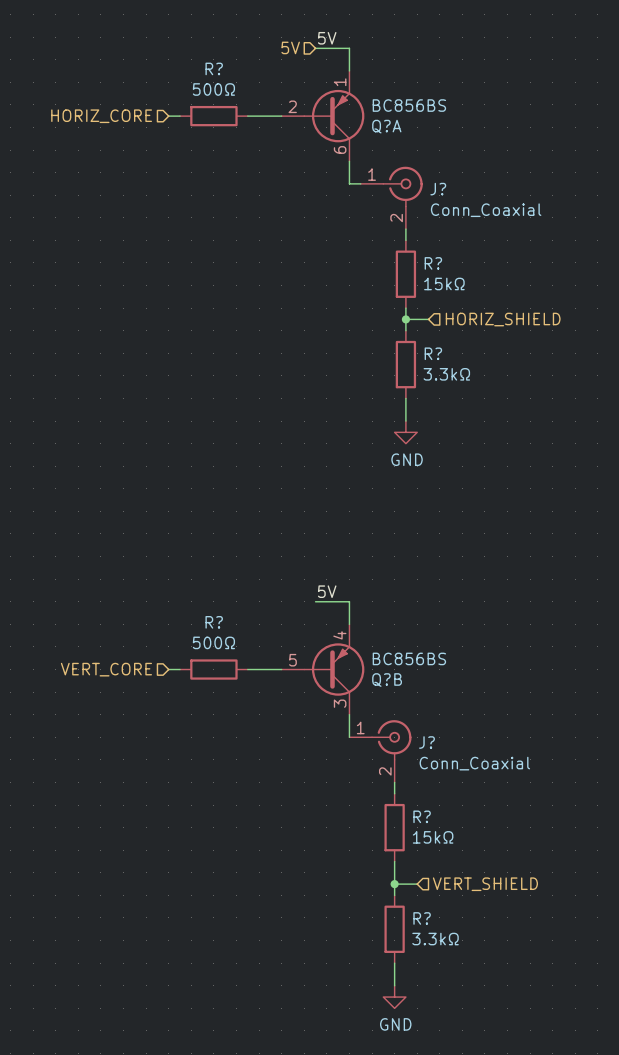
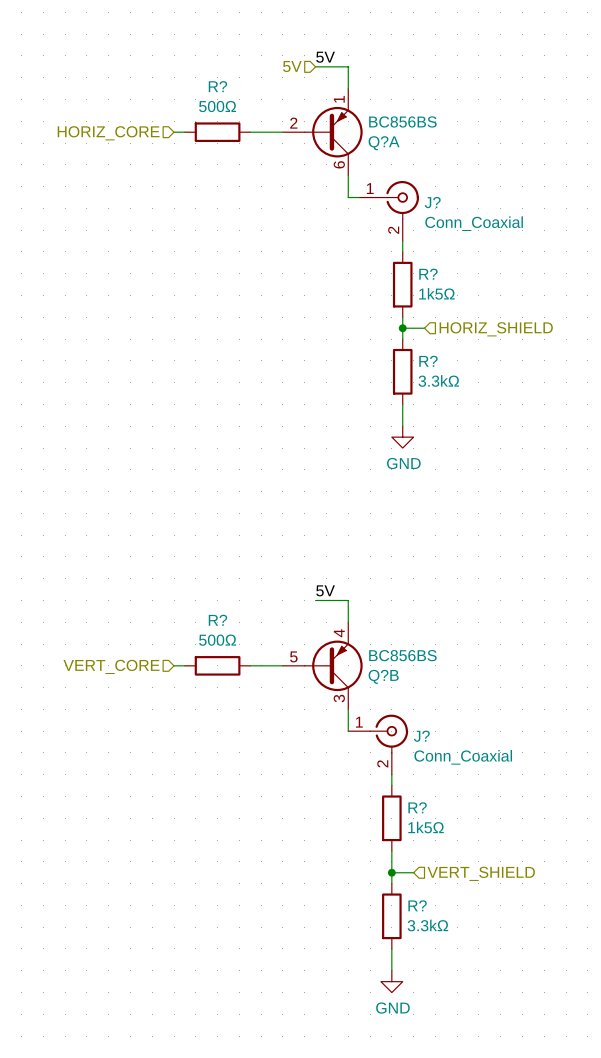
R? value: 15kΩ (444, 283) -> 1k5Ω (436, 293)
R? value: 15kΩ (433, 837) -> 1k5Ω (426, 827)

